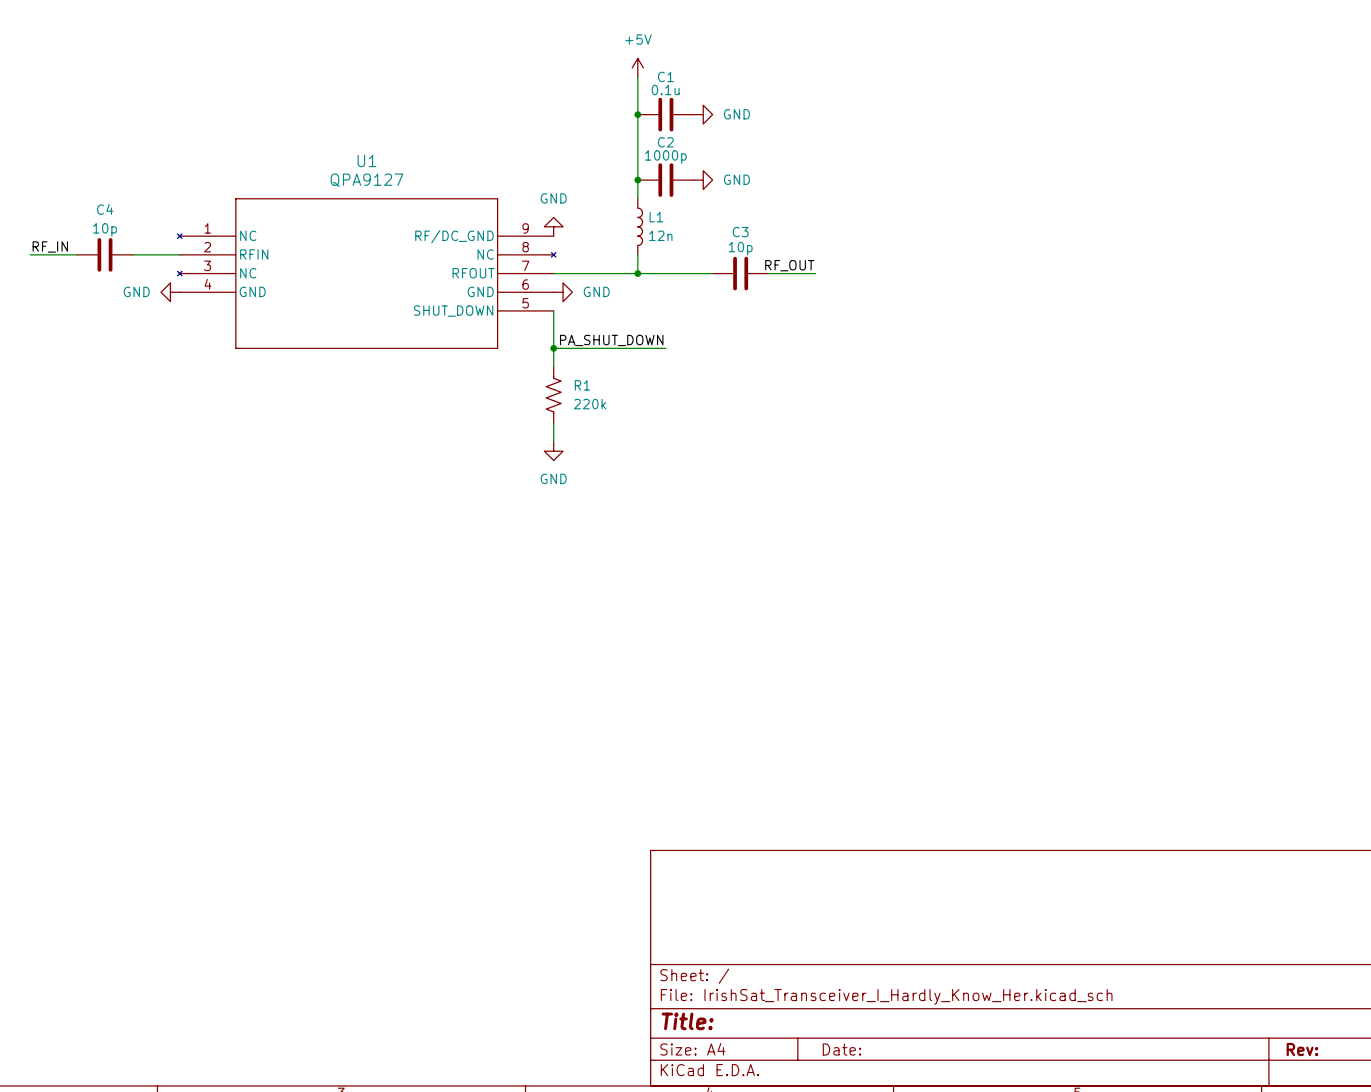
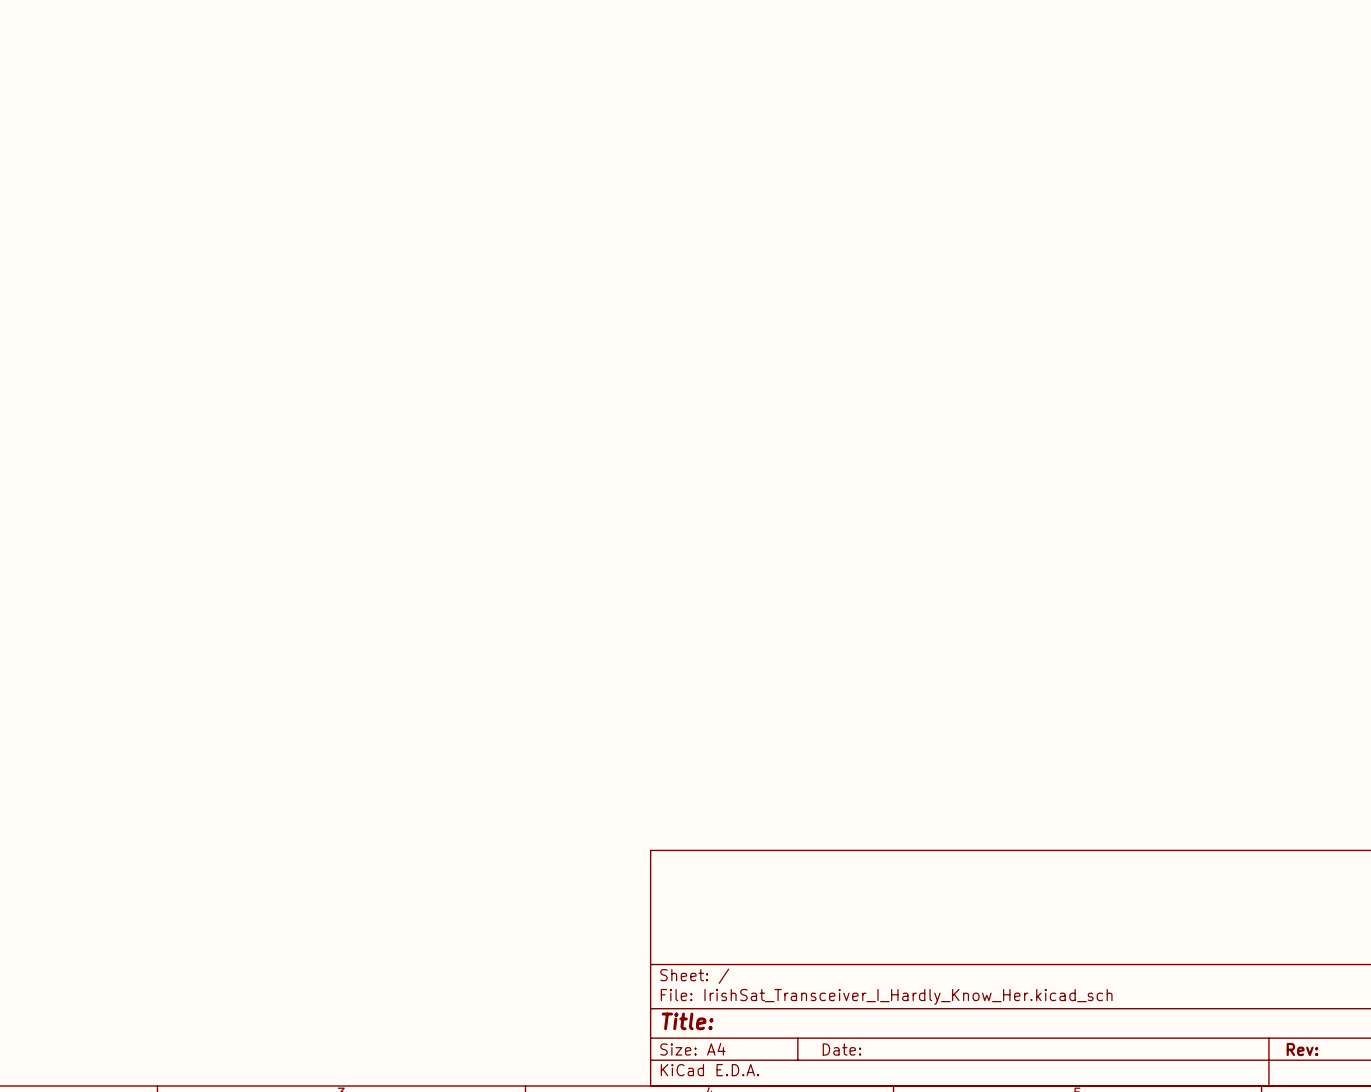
power symbol: +5V (637, 67) -> none
wire: (637, 77) (637, 198) -> none
junction: (637, 114) -> none
C1: 0.1u (665, 114) -> none
power symbol: GND (703, 114) -> none
junction: (637, 180) -> none
C2: 1000p (665, 180) -> none
power symbol: GND (703, 180) -> none
power symbol: GND (553, 226) -> none
L1: 12n (640, 226) -> none
label: RF_IN (50, 246) -> none
wire: (30, 254) (76, 254) -> none
C4: 10p (104, 254) -> none
wire: (133, 254) (179, 254) -> none
wire: (637, 254) (637, 273) -> none
label: RF_OUT (789, 265) -> none
U1: QPA9127 (366, 273) -> none
wire: (553, 273) (712, 273) -> none
junction: (637, 273) -> none
C3: 10p (740, 273) -> none
wire: (768, 273) (815, 273) -> none
power symbol: GND (170, 292) -> none
power symbol: GND (563, 292) -> none
wire: (553, 310) (553, 367) -> none
label: PA_SHUT_DOWN (611, 340) -> none
wire: (553, 348) (665, 348) -> none
junction: (553, 348) -> none
R1: 220k (553, 395) -> none
wire: (553, 423) (553, 441) -> none
power symbol: GND (553, 451) -> none

